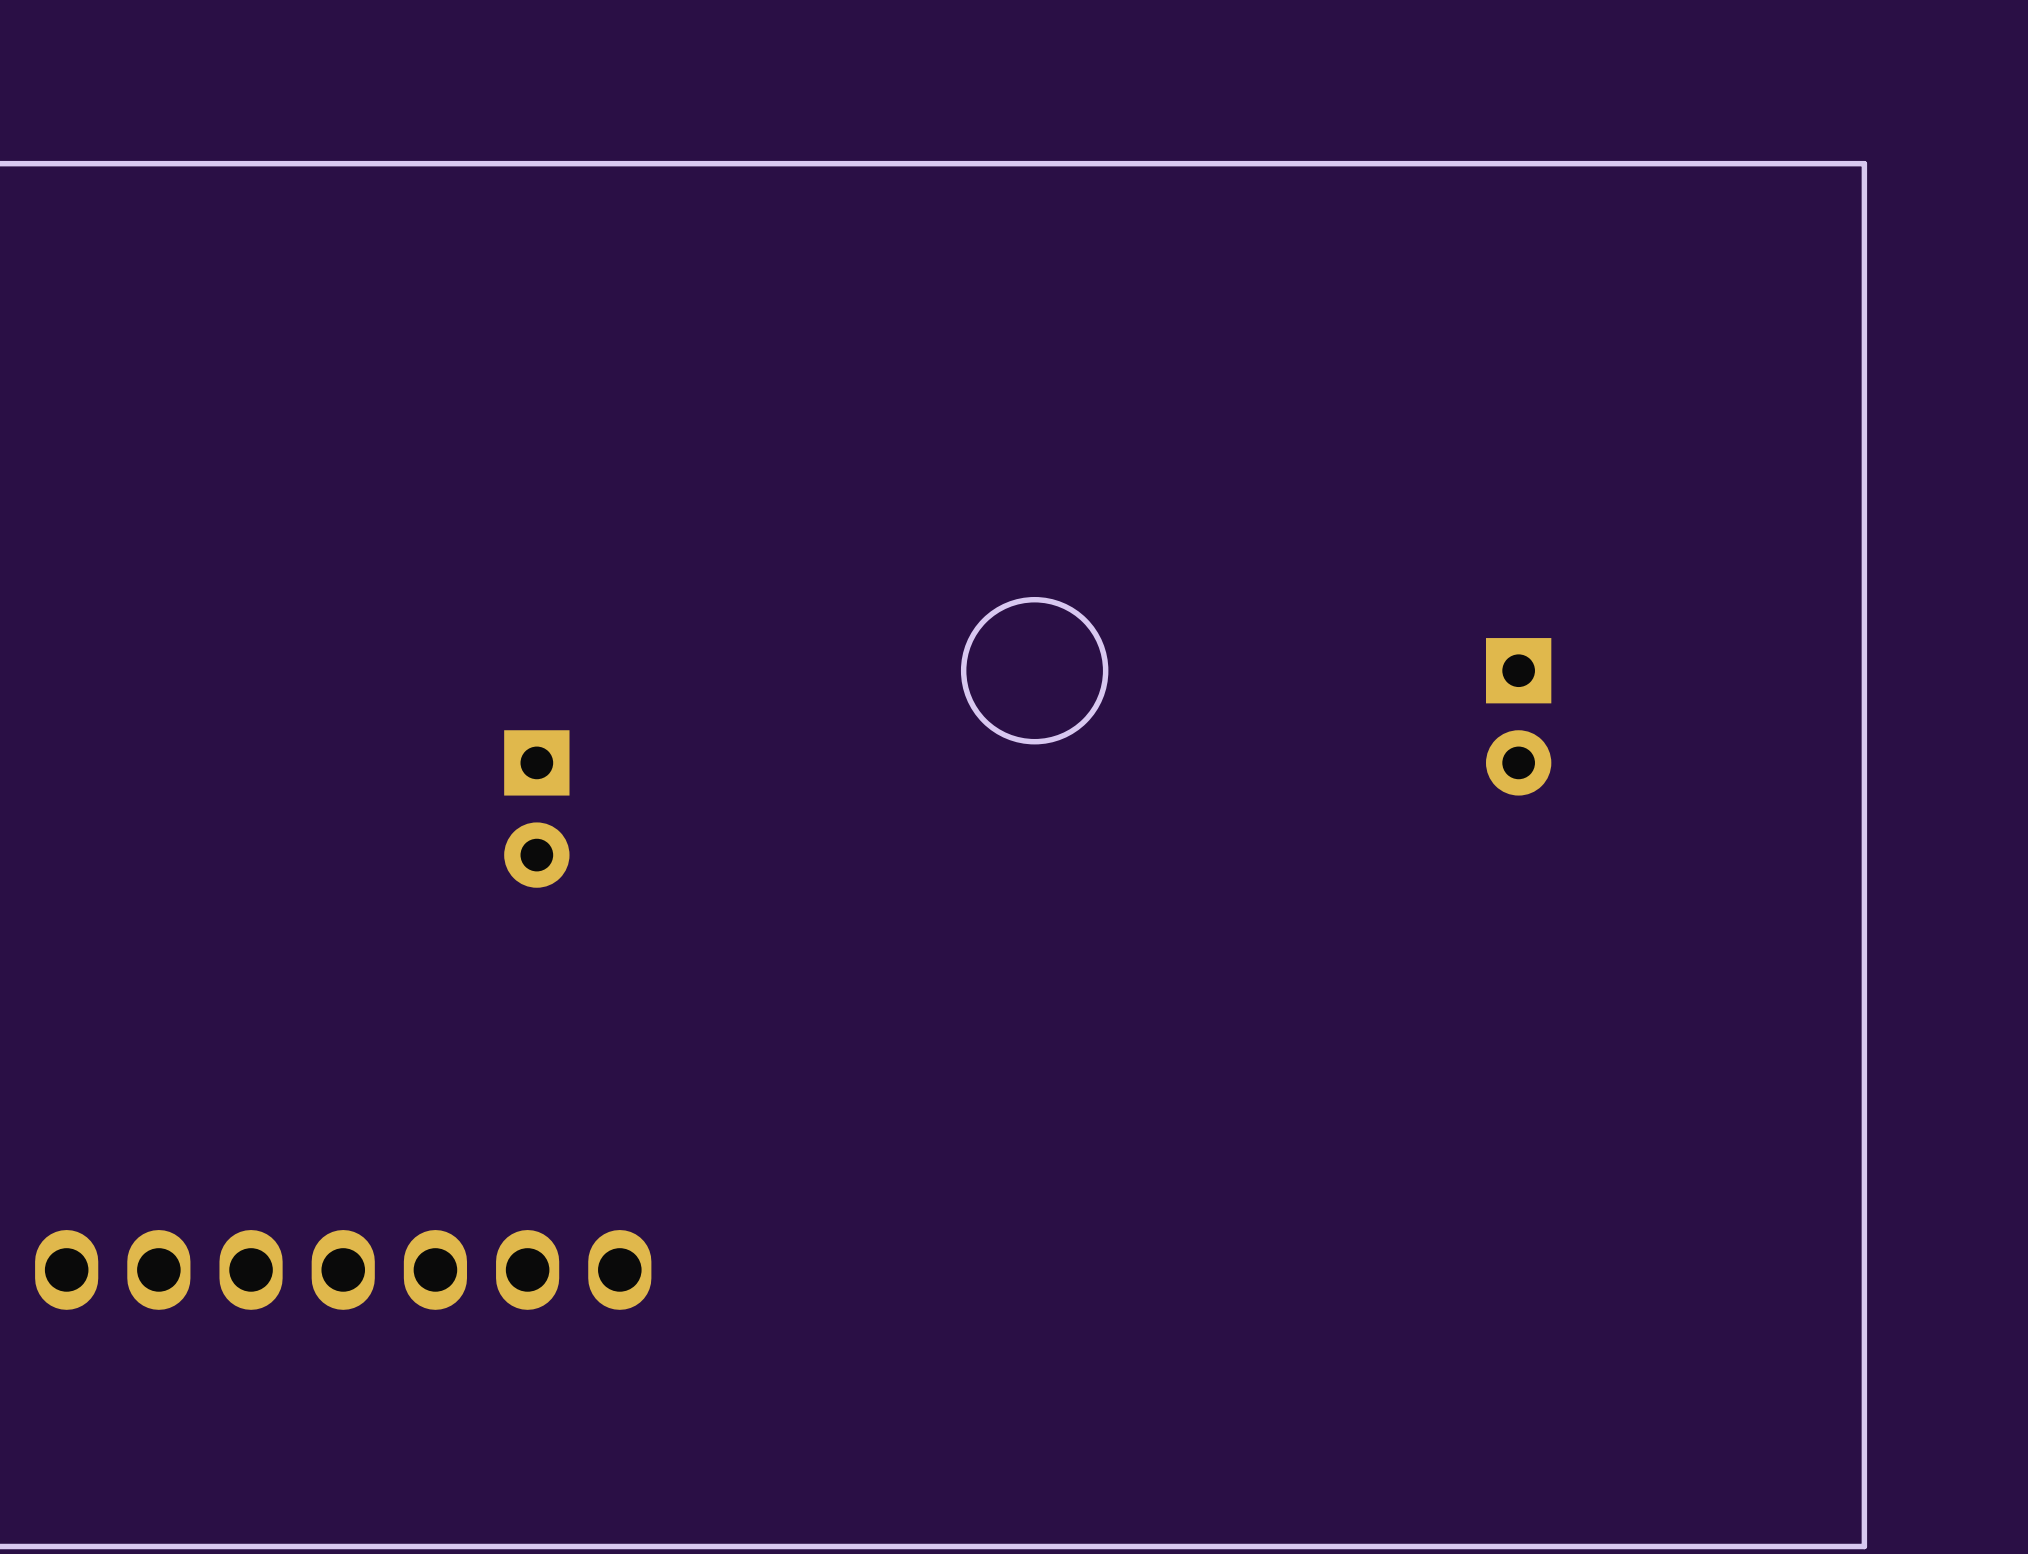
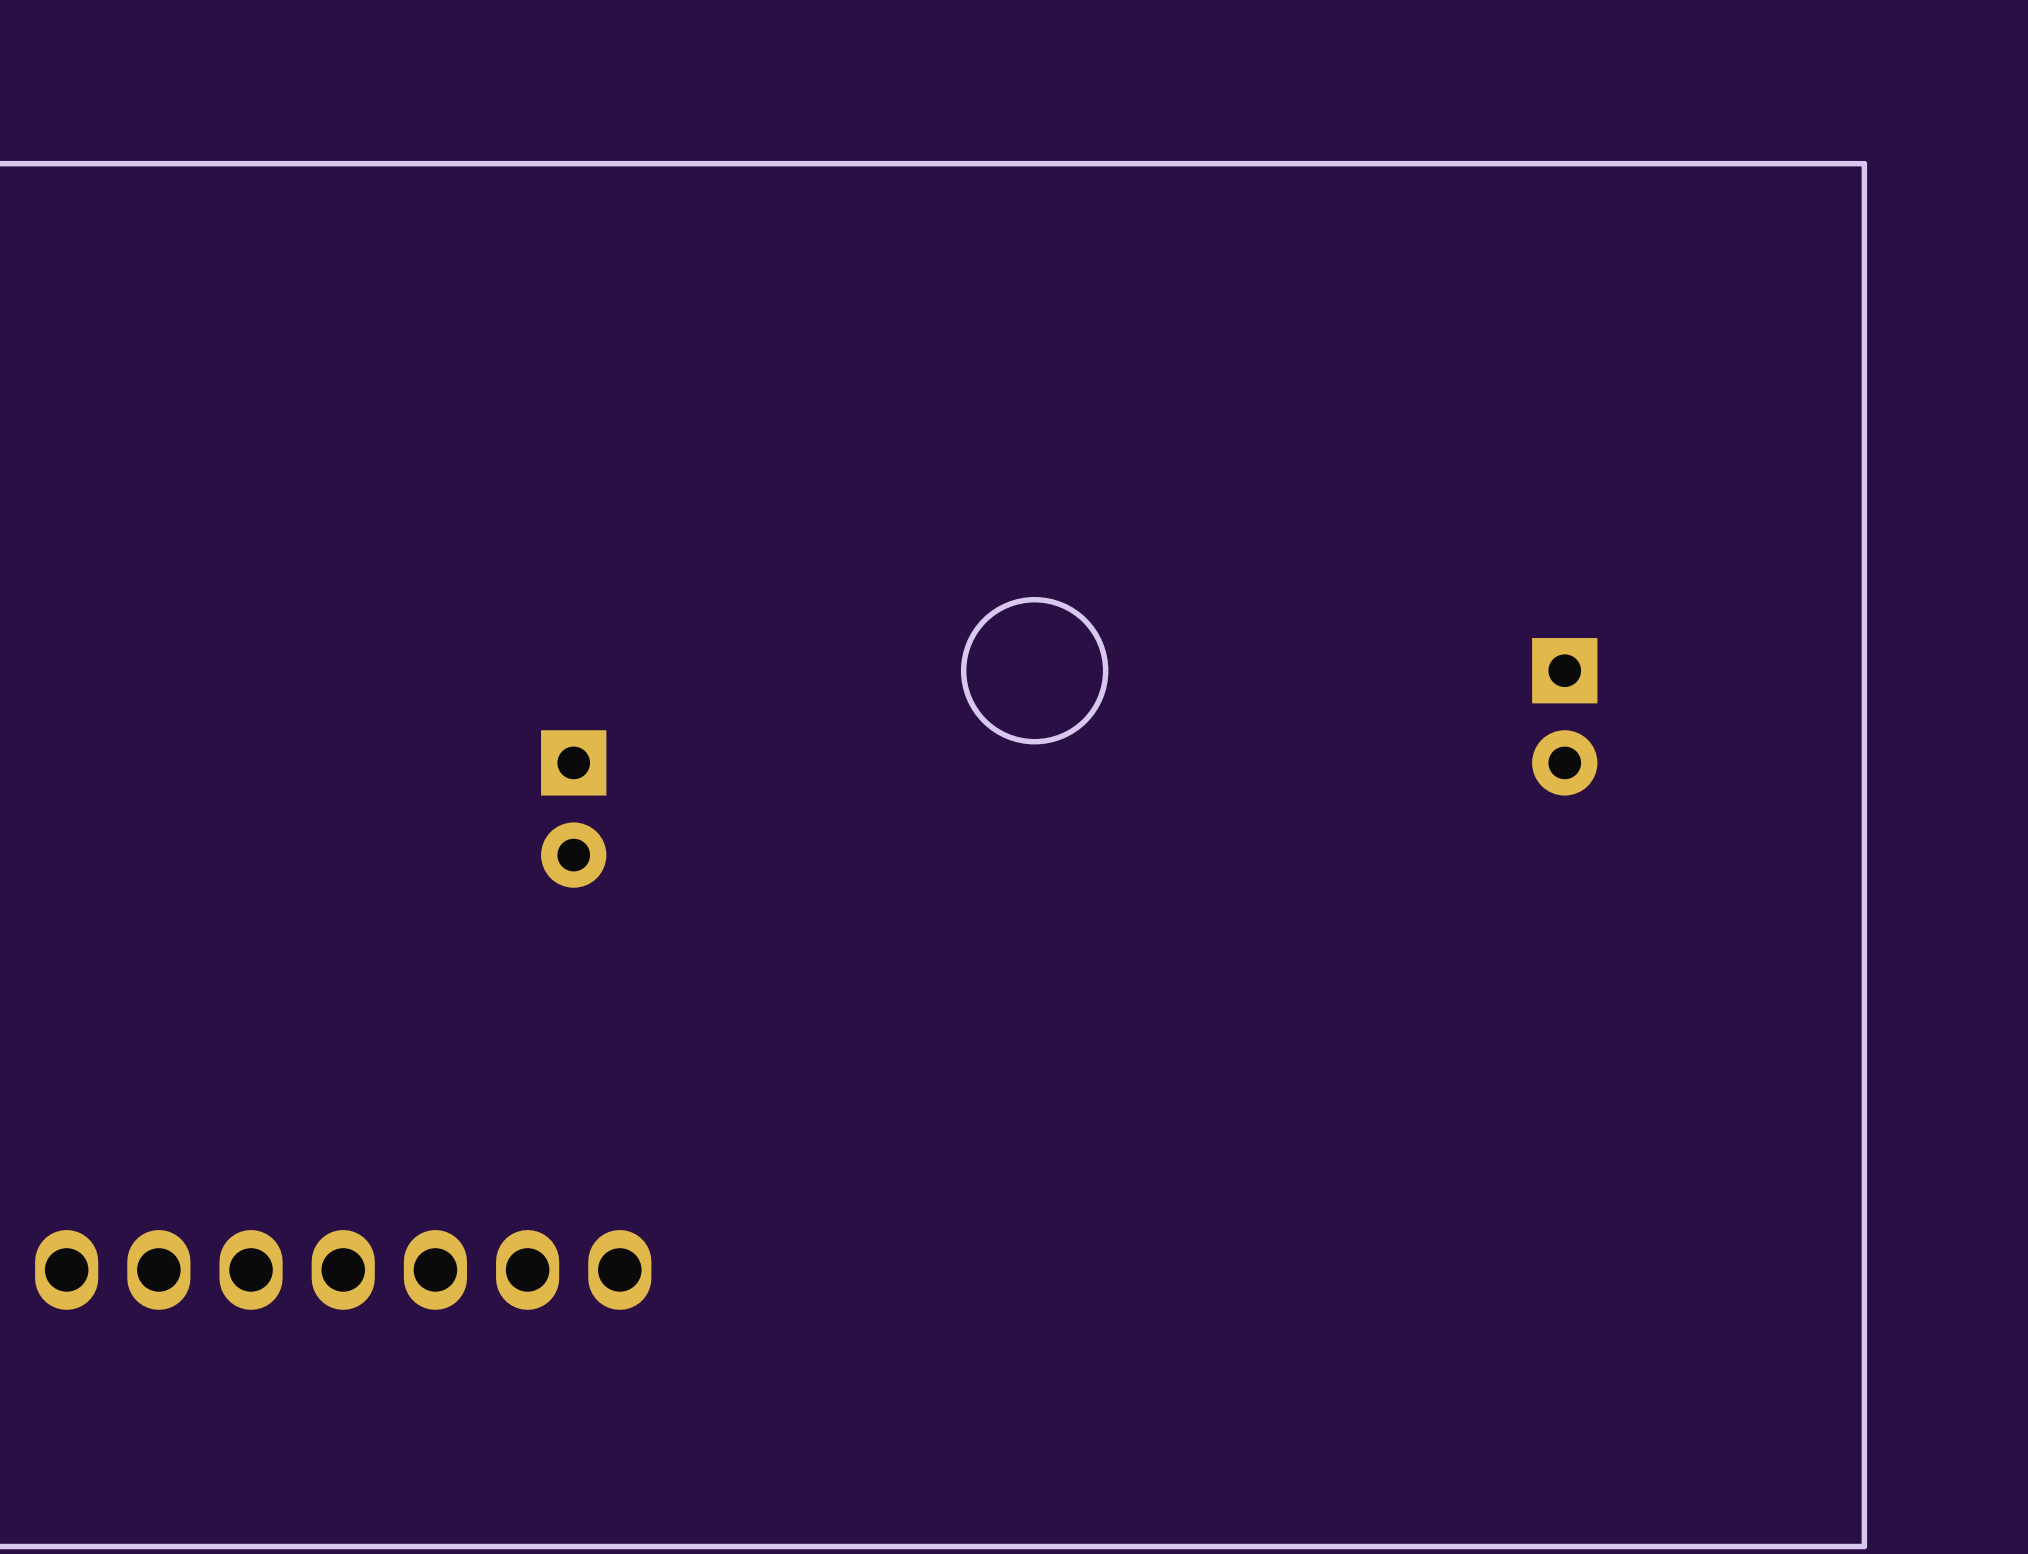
part position: (1518, 716) -> (1564, 716)
part position: (536, 808) -> (573, 808)

